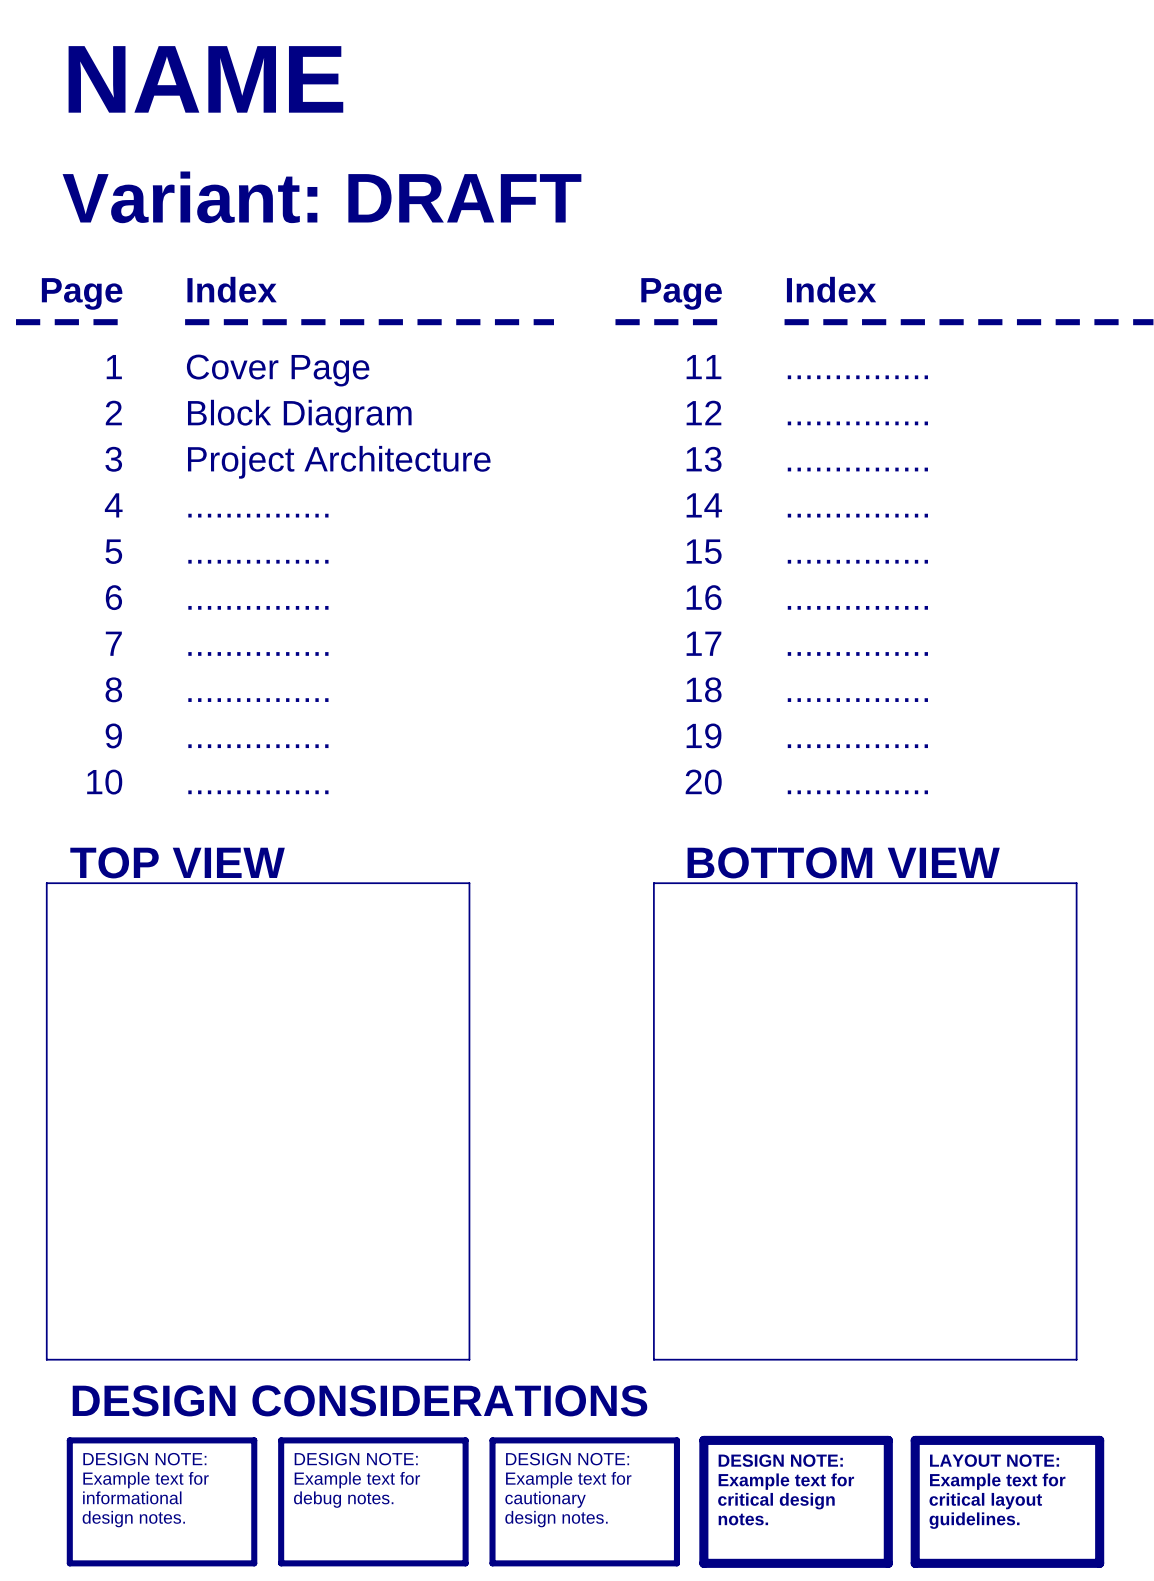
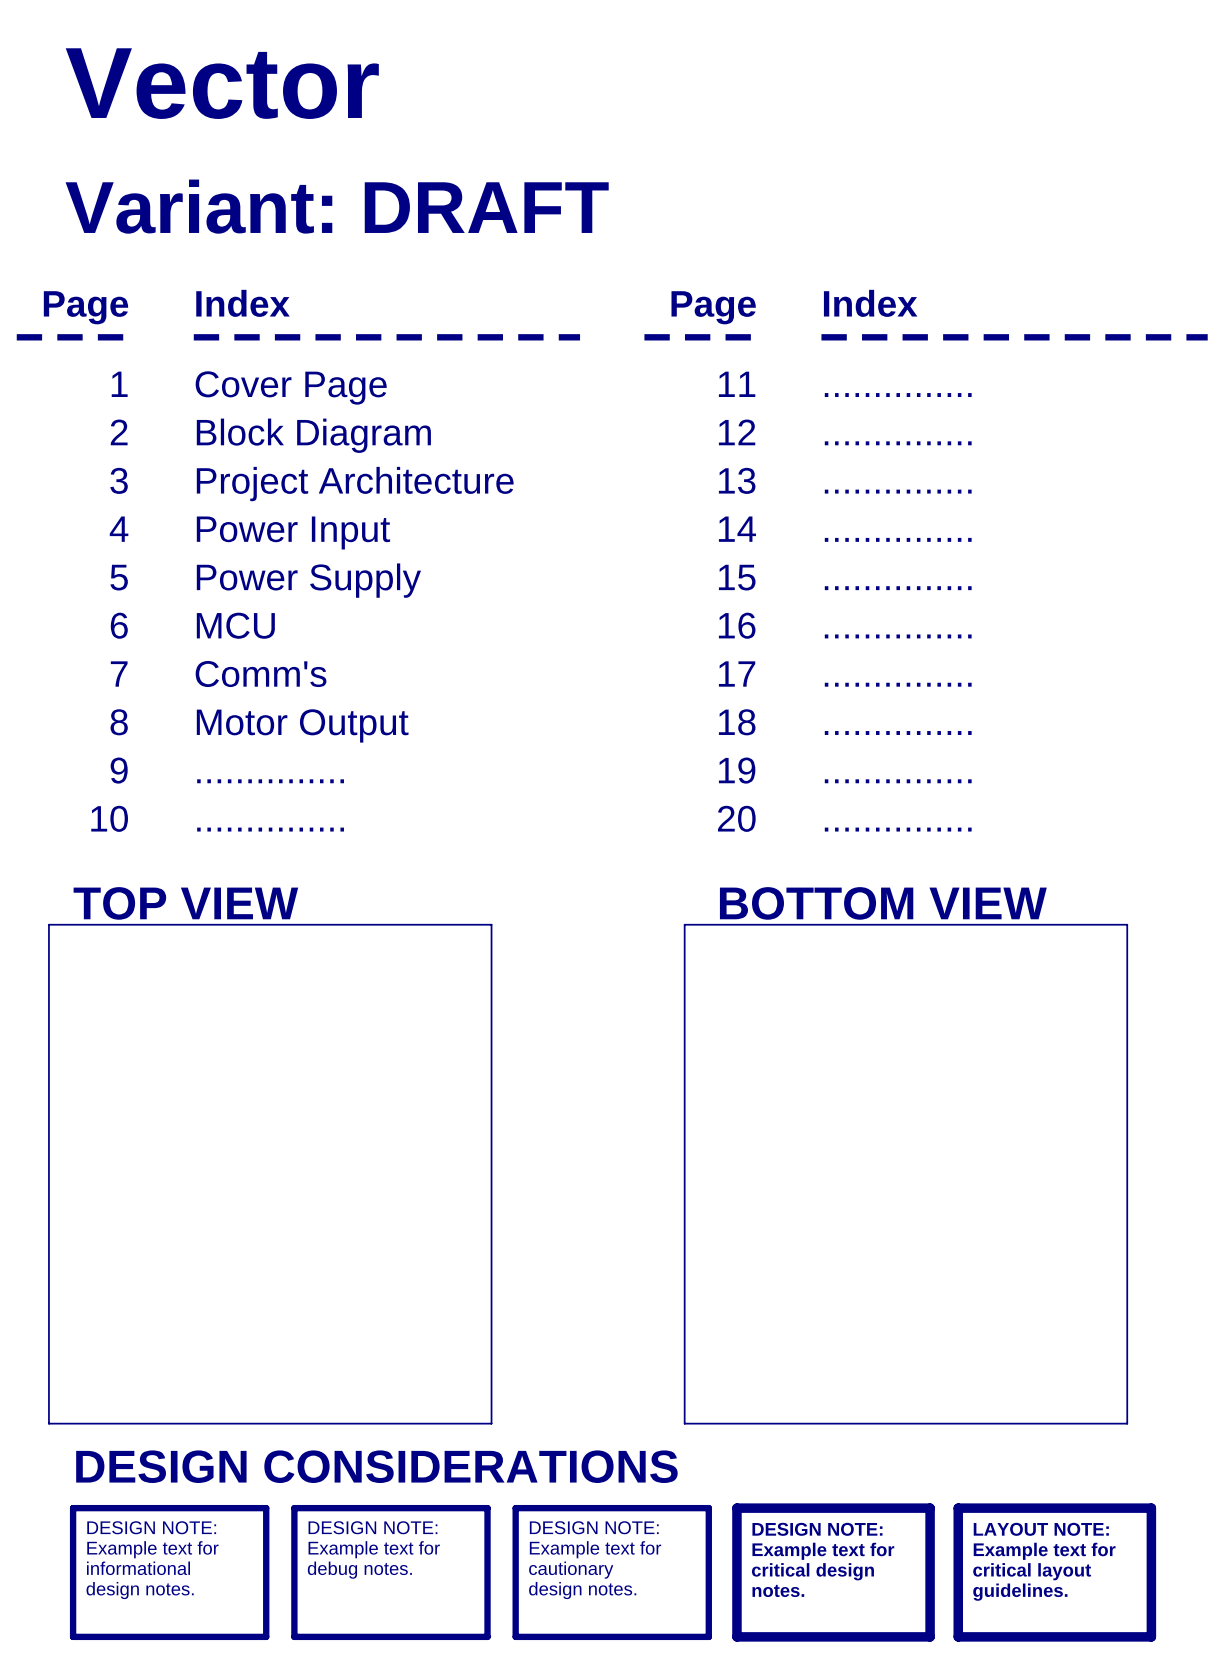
text: NAME (205, 79) -> Vector (222, 83)
text: ............... (258, 515) -> Power Input (293, 532)
text: ............... (258, 561) -> Power Supply (308, 580)
text: ............... (258, 607) -> MCU (235, 625)
text: ............... (258, 653) -> Comm's (261, 674)
text: ............... (258, 700) -> Motor Output (302, 725)

